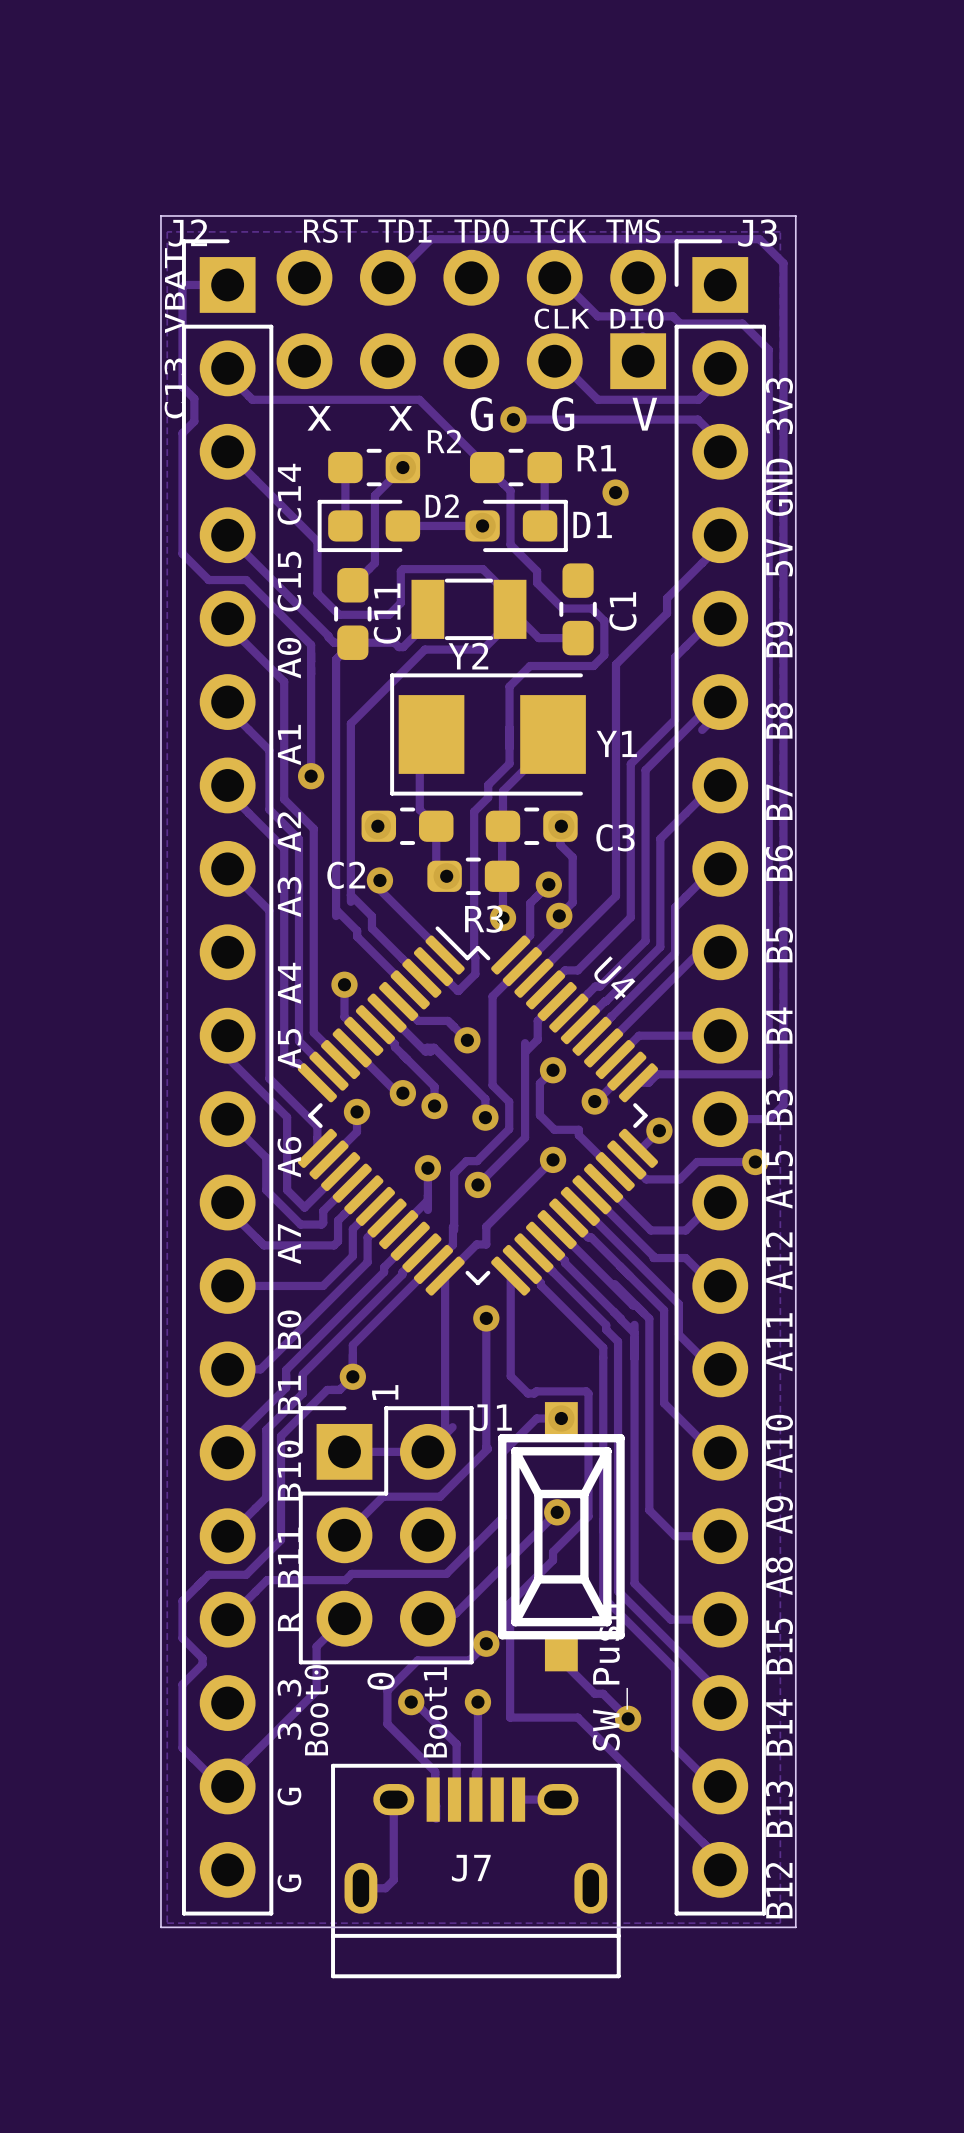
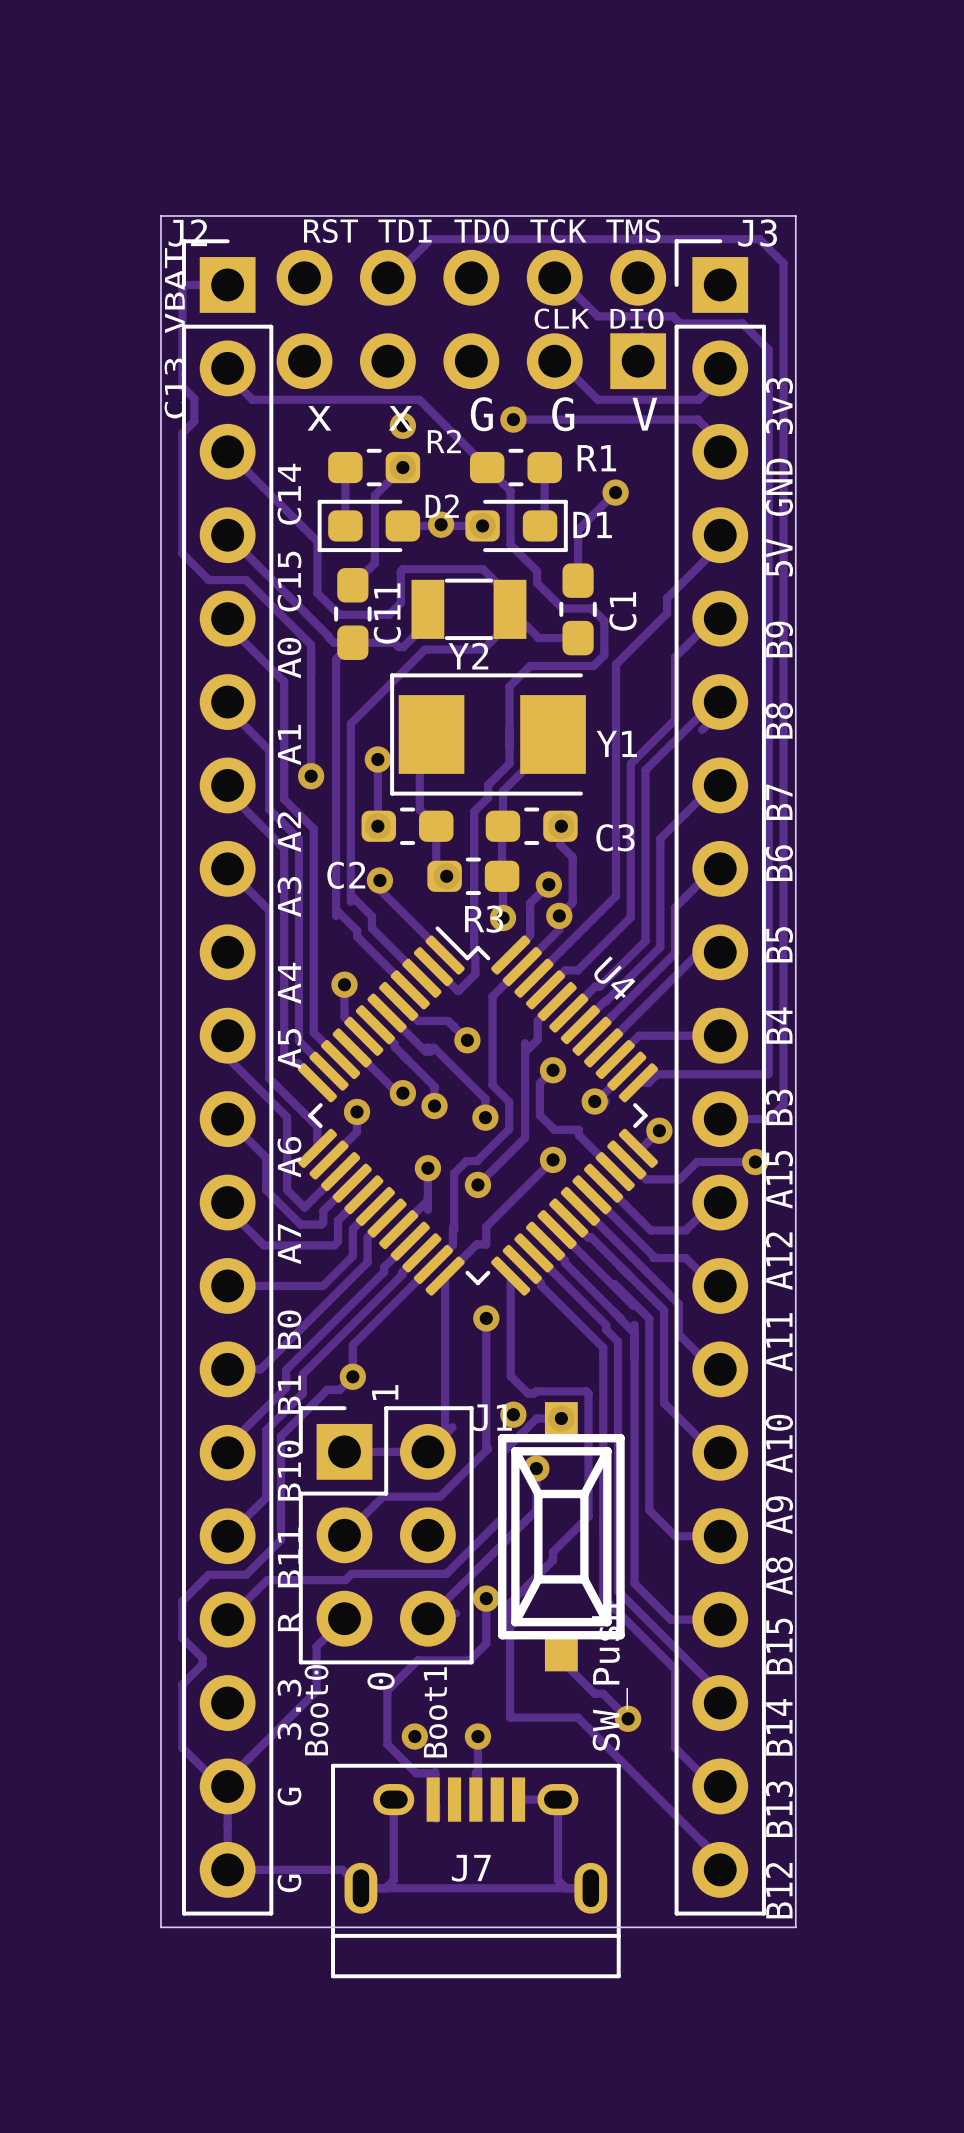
zone outline: (167, 231) (167, 1923) (780, 1923) (780, 231) (167, 231) -> none
via: none -> (402, 425)
track: none -> (615, 492) (578, 530) (578, 580)
via: none -> (441, 524)
track: none -> (377, 759) (378, 826)
via: none -> (377, 759)
via: none -> (513, 1414)
track: none -> (536, 1468) (536, 1510) (433, 1613)
track: (557, 1512) (456, 1613) -> none
via position: (557, 1512) -> (536, 1468)
track: none -> (486, 1598) (486, 1643)
via position: (486, 1643) -> (486, 1598)
track: (411, 1702) (414, 1702) (456, 1744) (456, 1797) -> none
via position: (411, 1702) -> (414, 1736)
track: (477, 1702) (477, 1736) -> none
via position: (477, 1702) -> (477, 1736)
track: (387, 1724) (435, 1771) -> (387, 1724) (387, 1744) (416, 1773) (435, 1774)
track: none -> (227, 1786) (227, 1869) (342, 1869) (360, 1888)
track: none -> (557, 1799) (557, 1880) (566, 1888)
track: none -> (385, 1888) (590, 1888)

